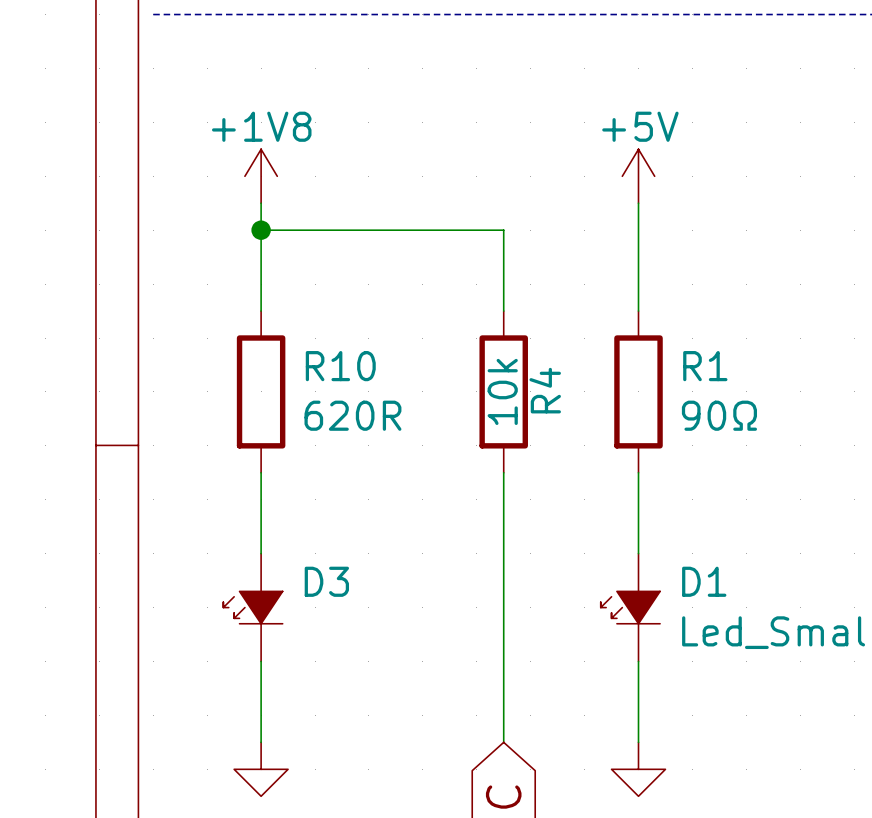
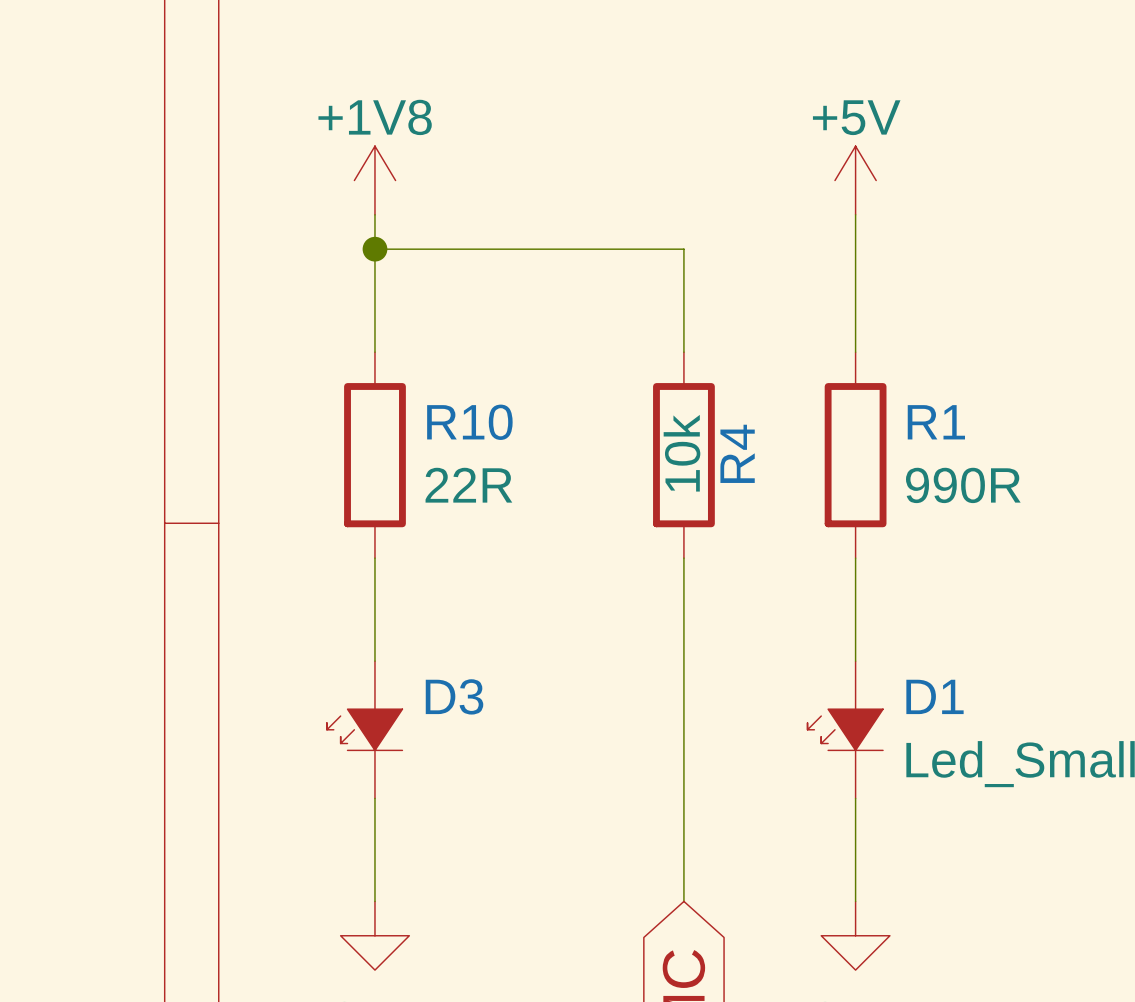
R10 value: 620R (352, 415) -> 22R (468, 485)
R1 value: 90Ω (719, 415) -> 990R (963, 485)

